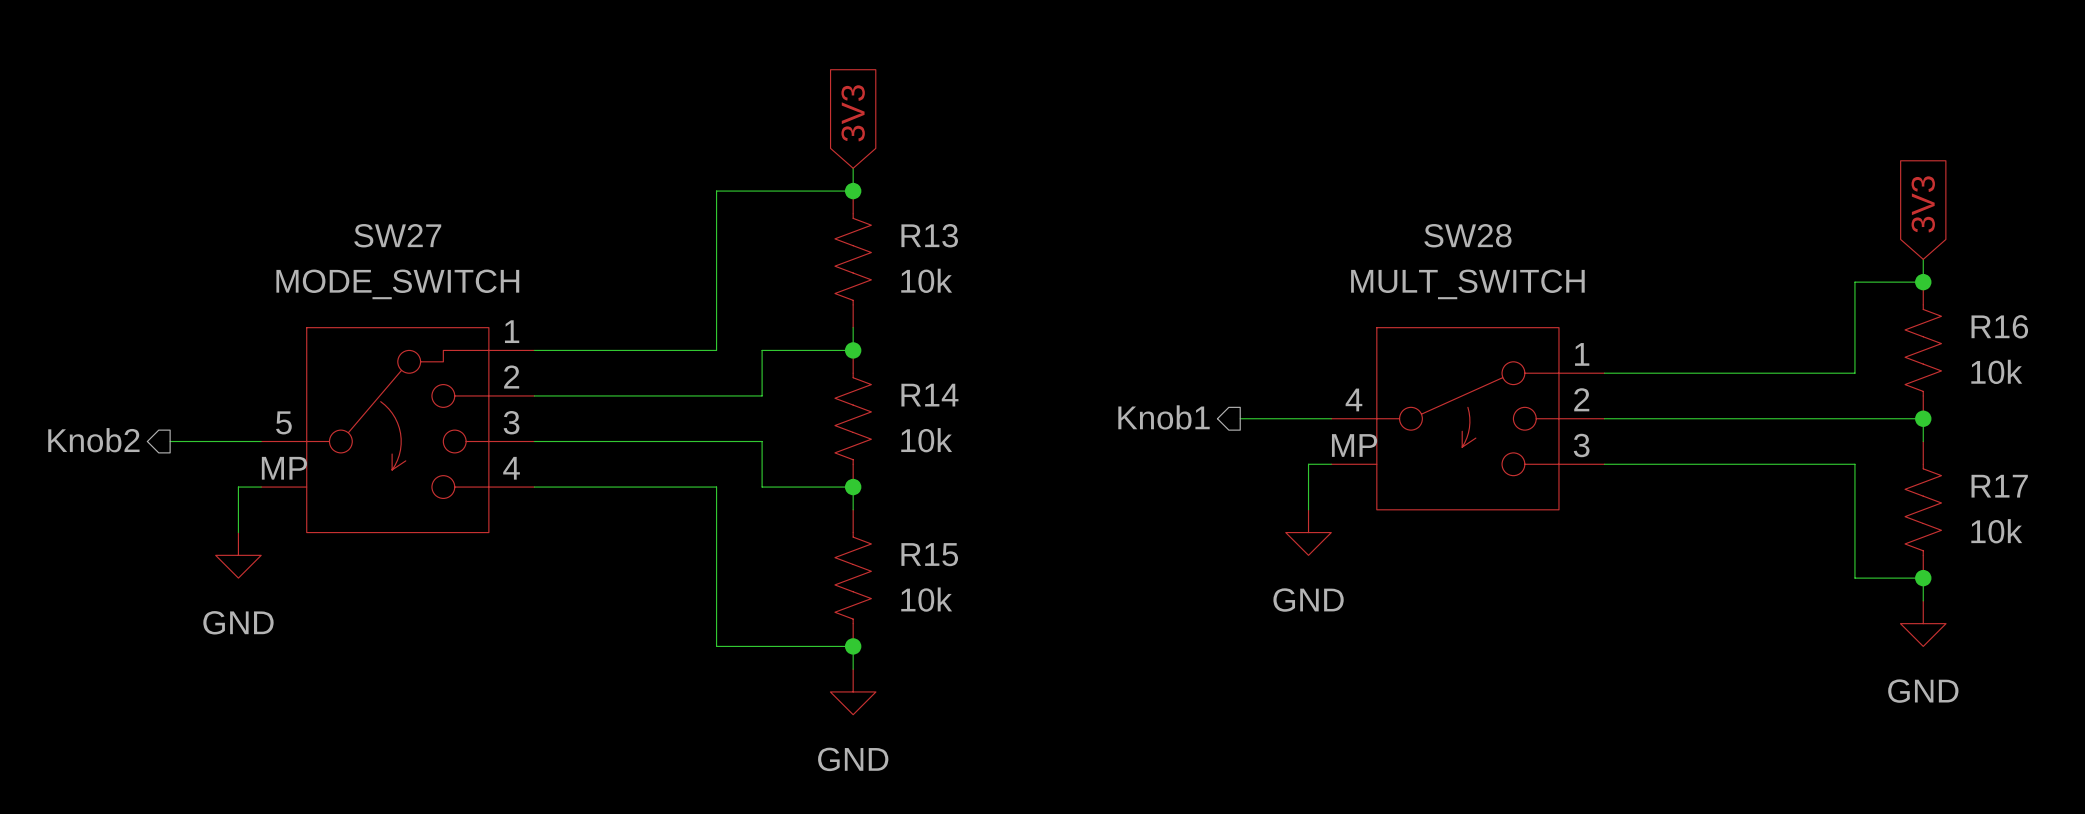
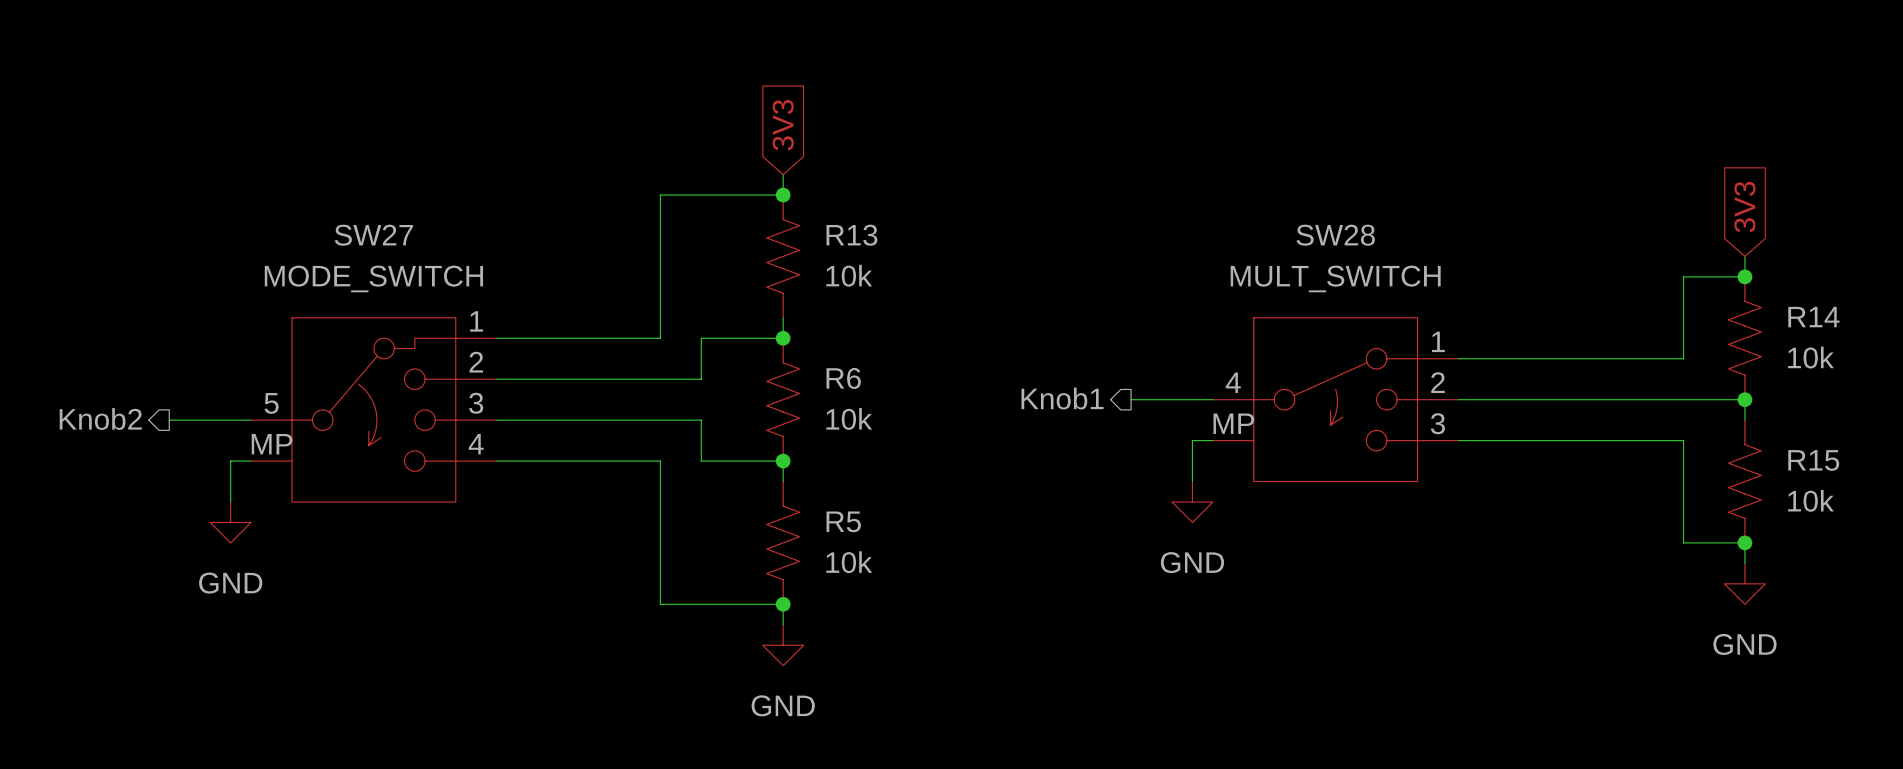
R16 name: R16 (1999, 326) -> R14 (1813, 317)
R14 name: R14 (929, 395) -> R6 (843, 378)
R17 name: R17 (1999, 486) -> R15 (1813, 460)
R15 name: R15 (929, 554) -> R5 (843, 521)

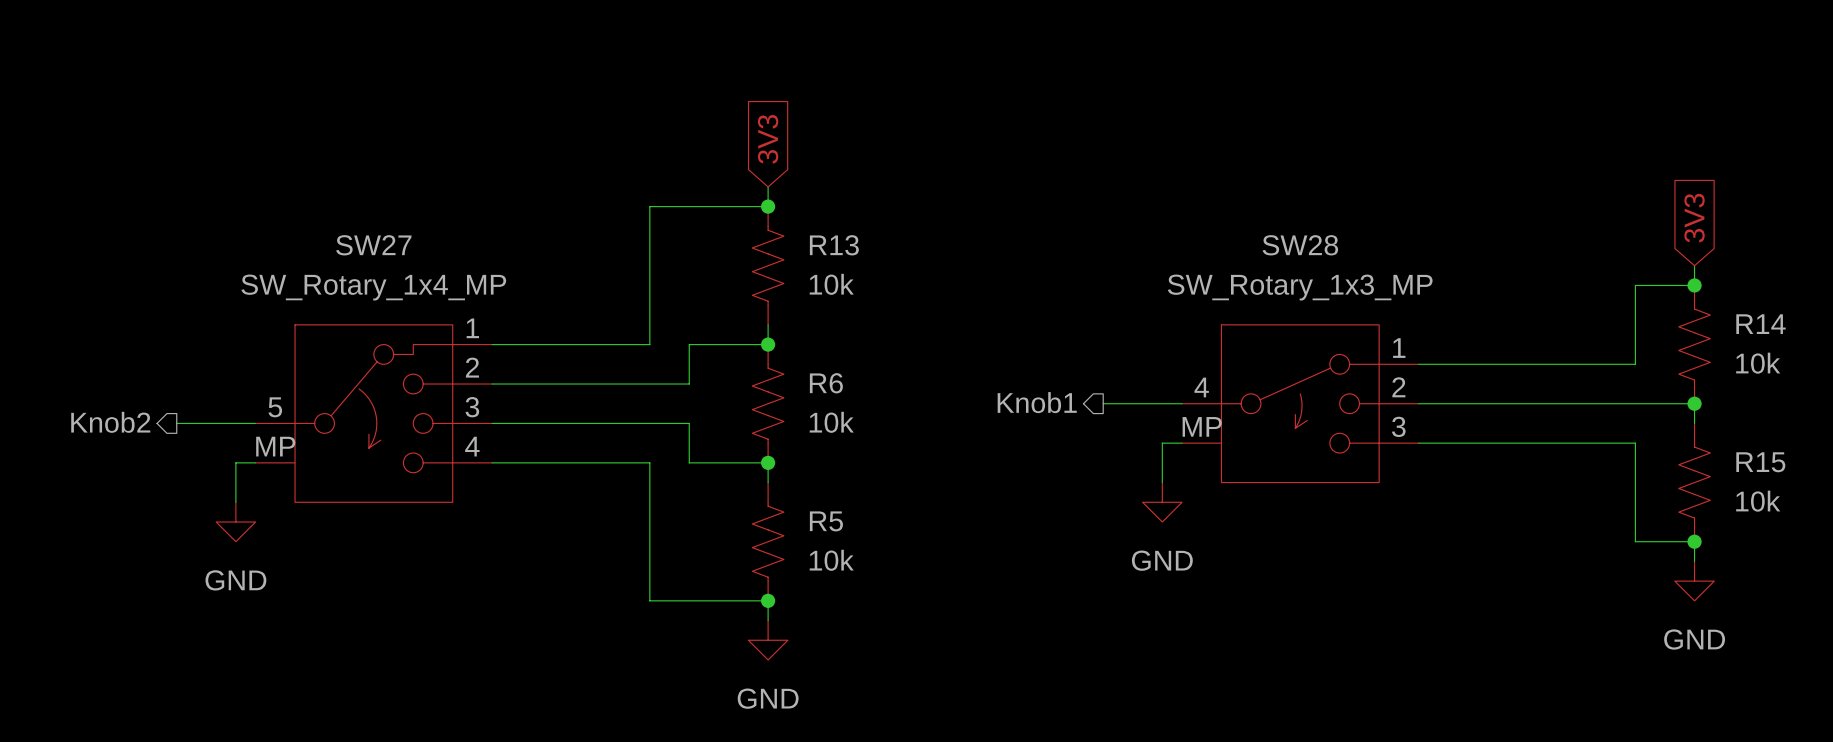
SW27 value: MODE_SWITCH (373, 278) -> SW_Rotary_1x4_MP (373, 287)
SW28 value: MULT_SWITCH (1335, 278) -> SW_Rotary_1x3_MP (1300, 287)

